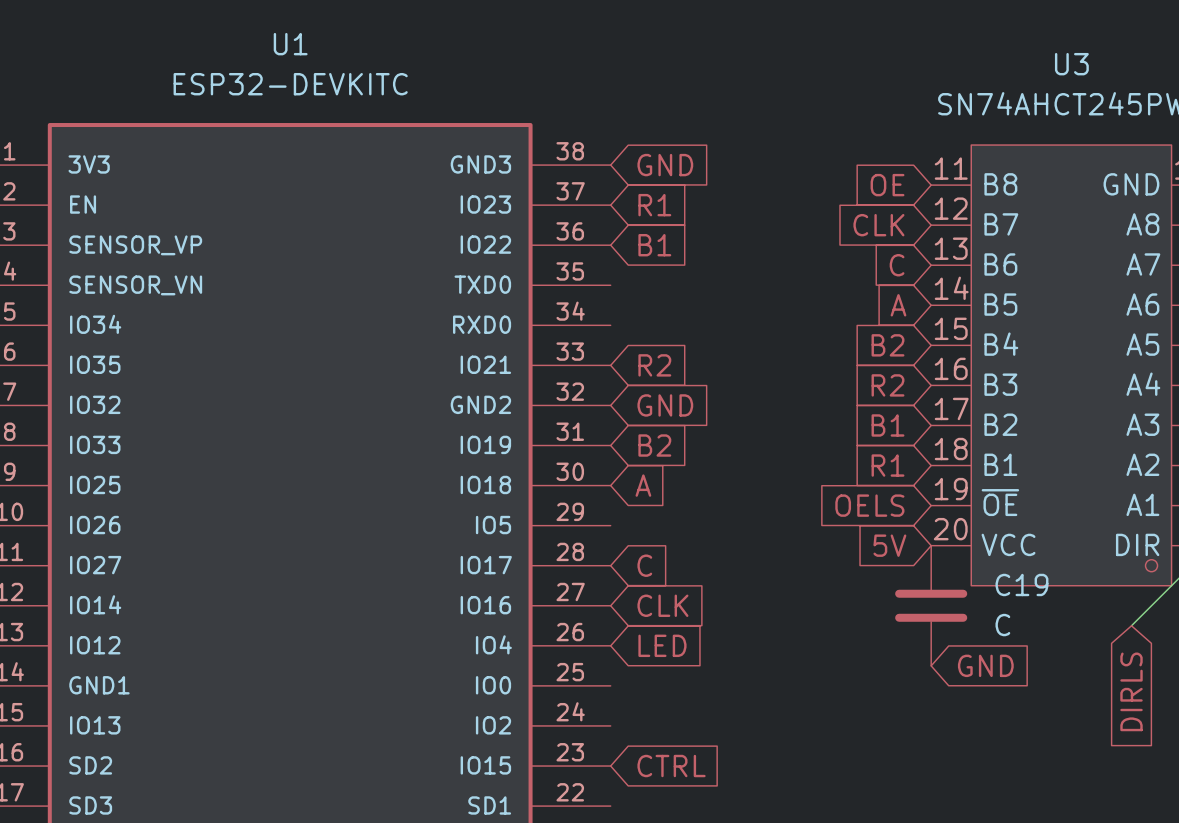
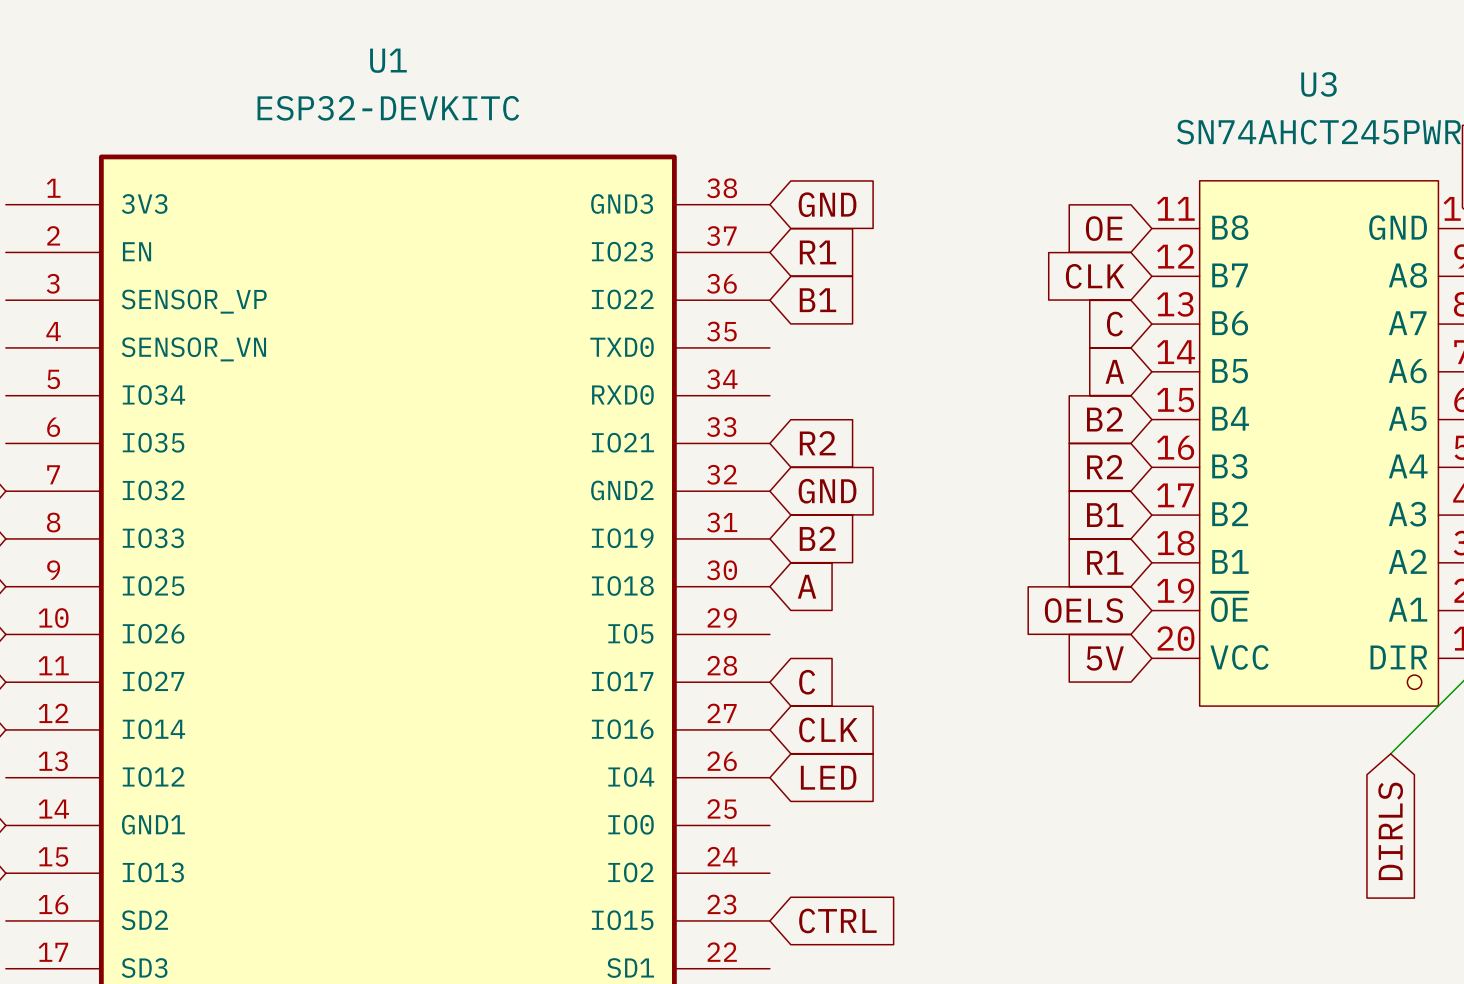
C19: C (931, 605) -> none
global label: GND (985, 665) -> none

